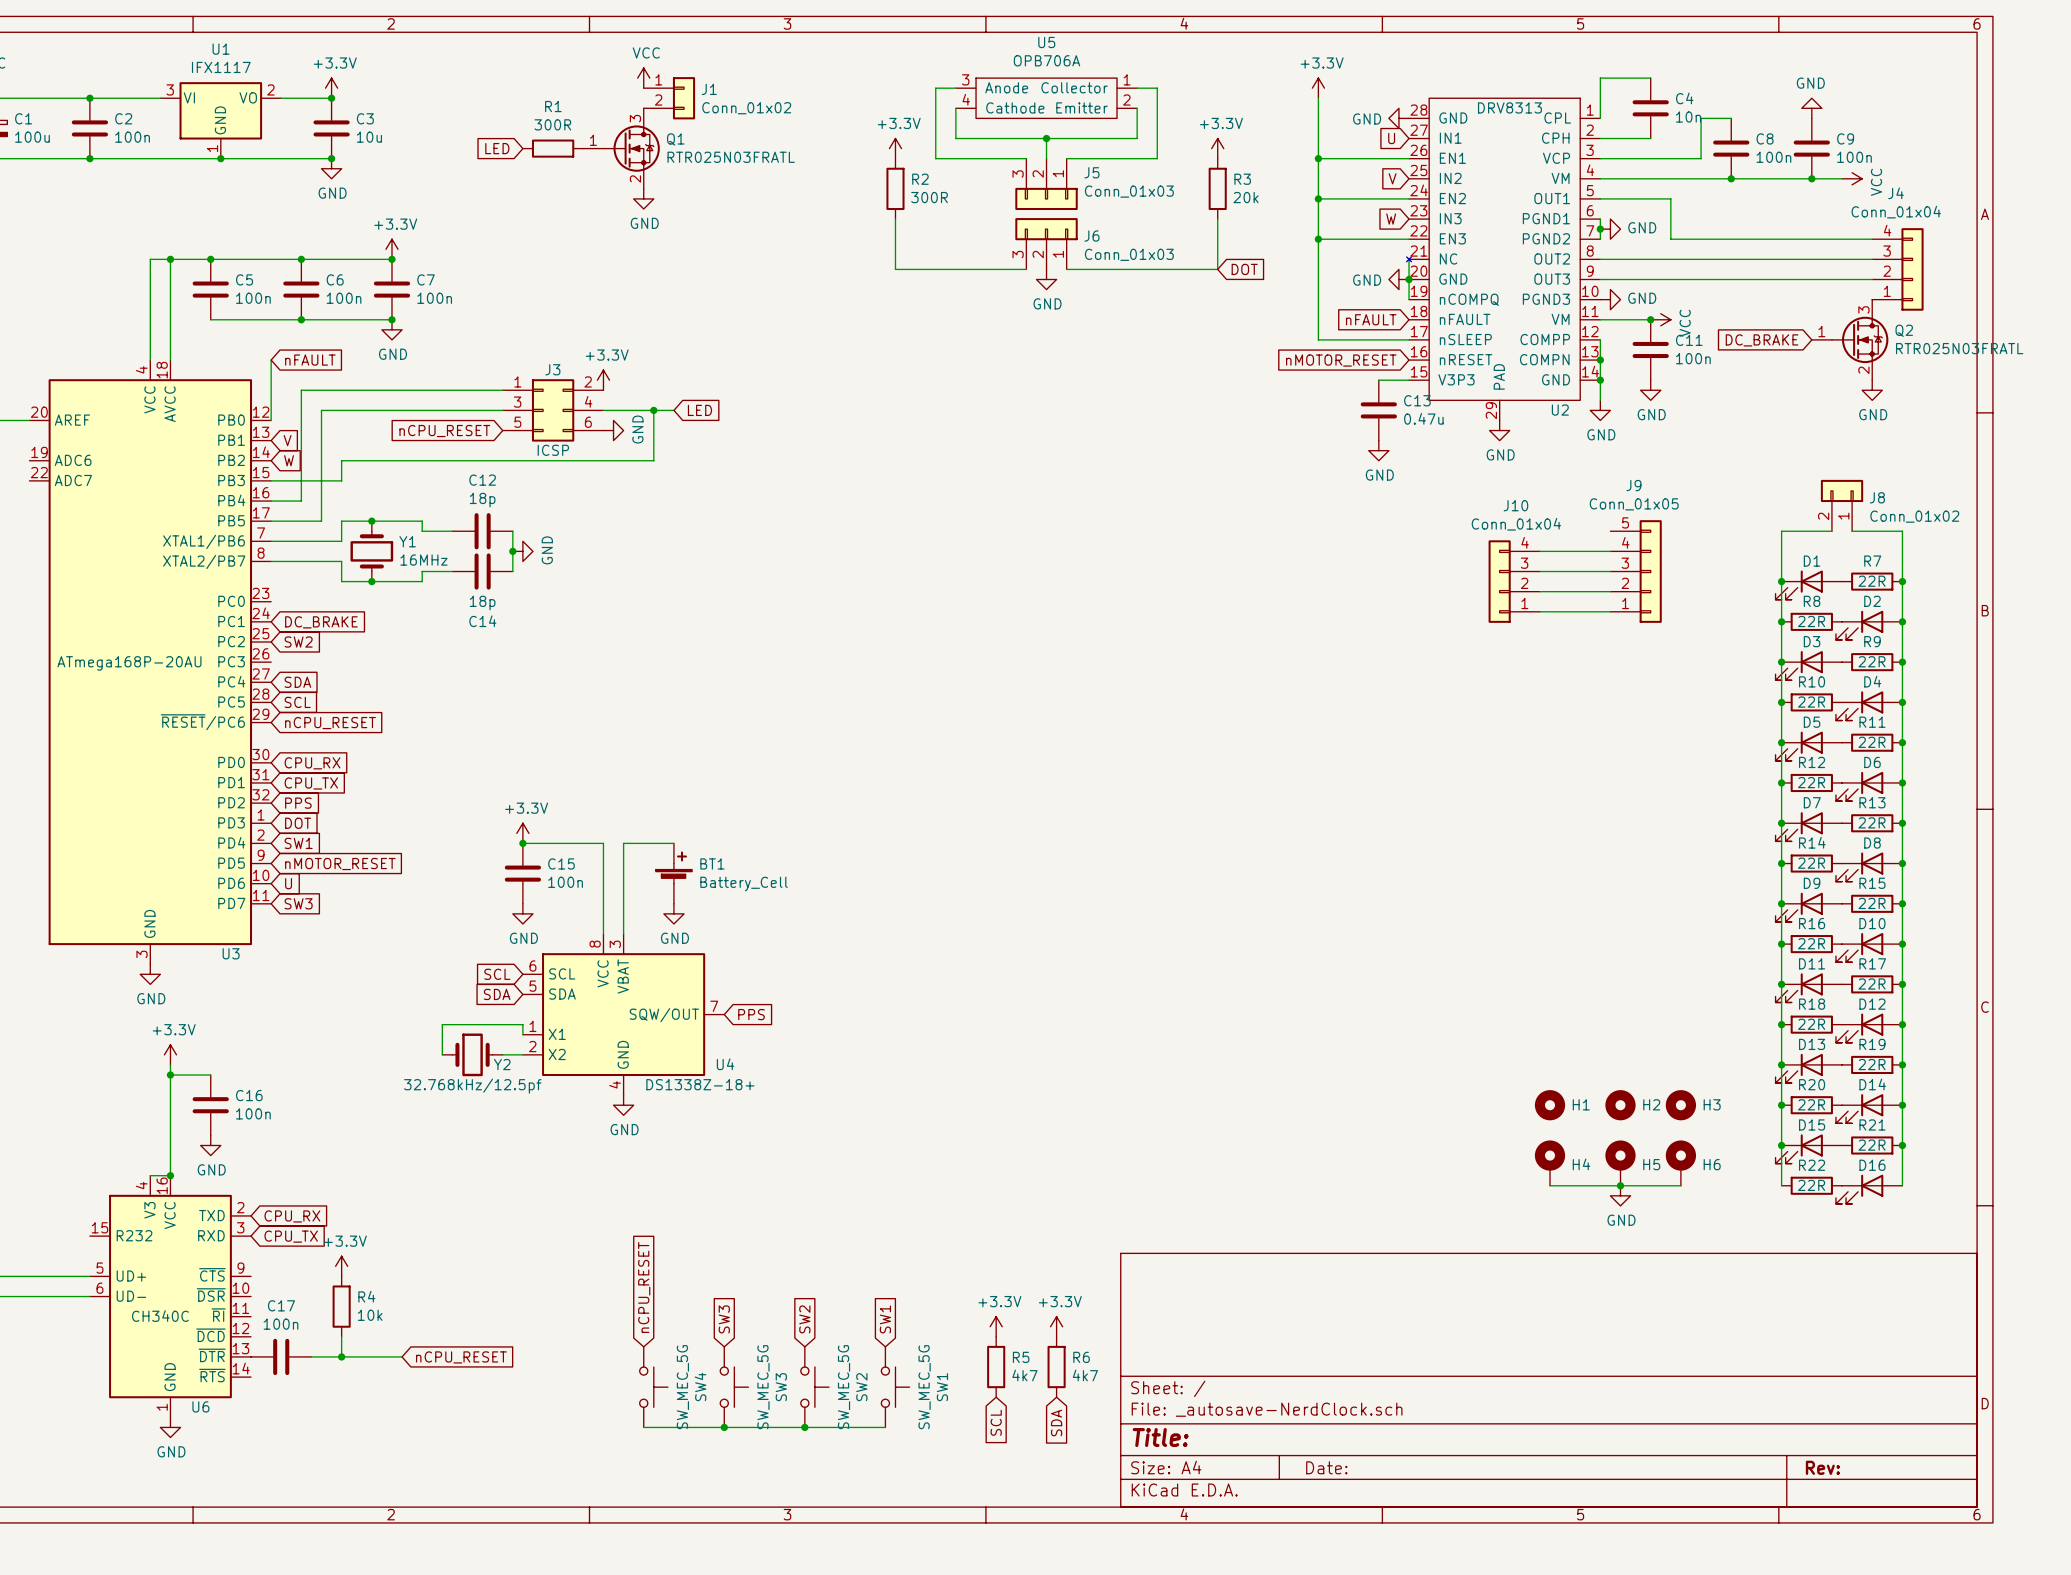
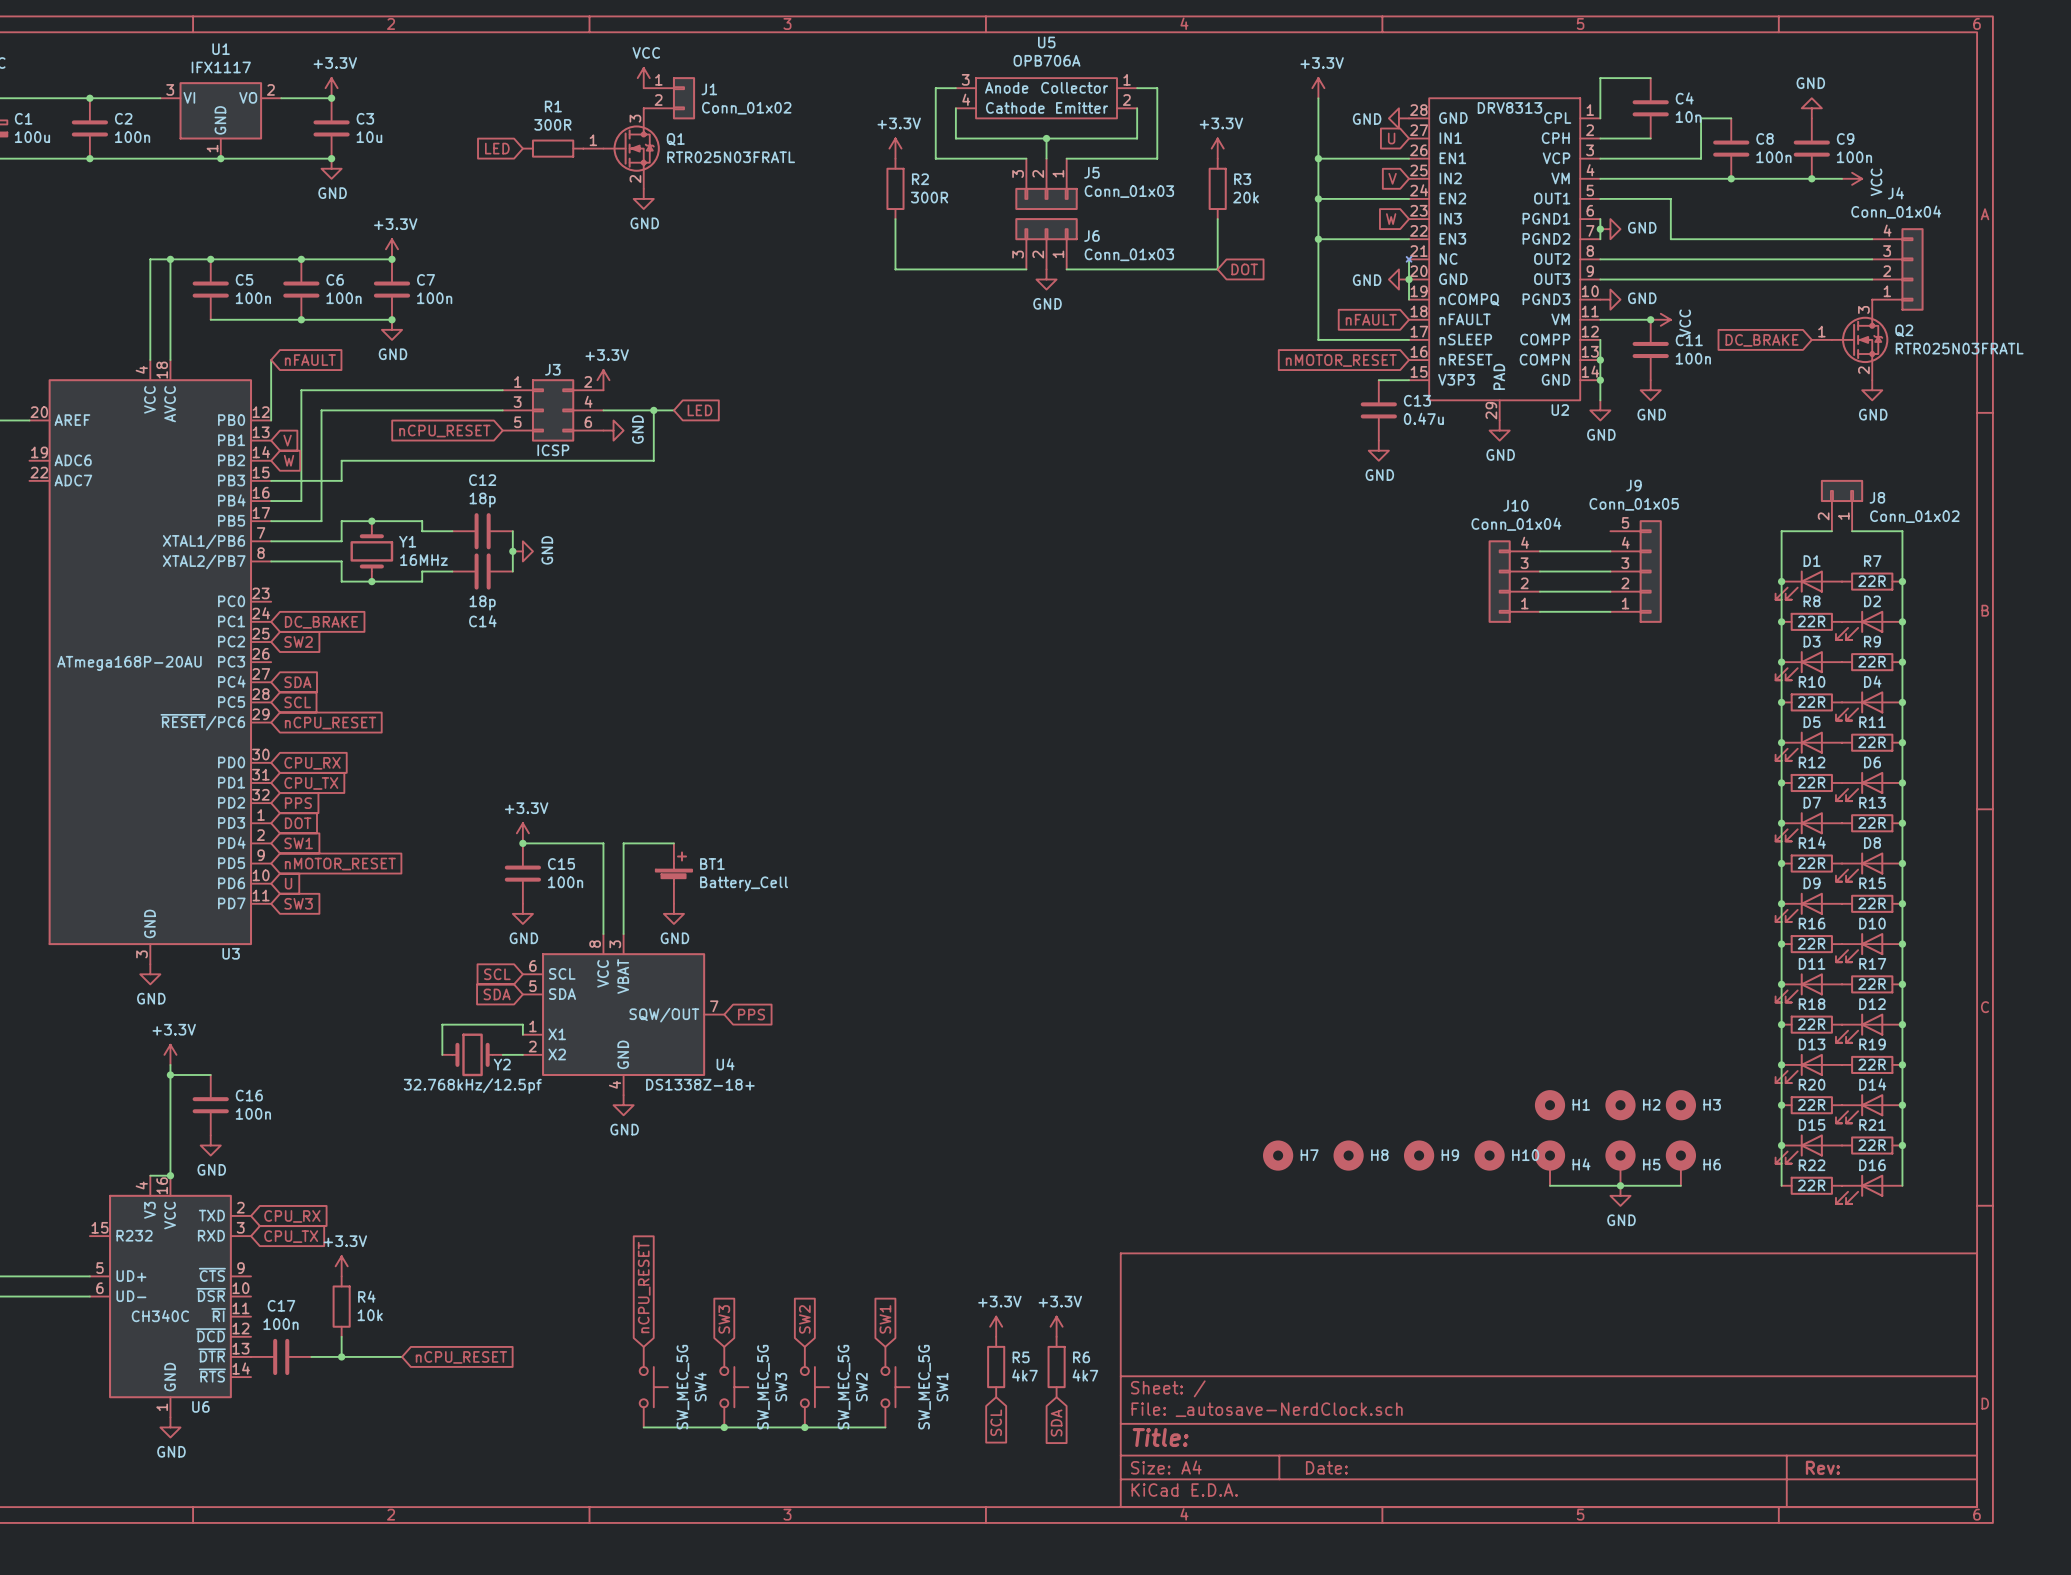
H7: none -> (1278, 1155)
H8: none -> (1348, 1155)
H9: none -> (1419, 1155)
H10: none -> (1489, 1155)

